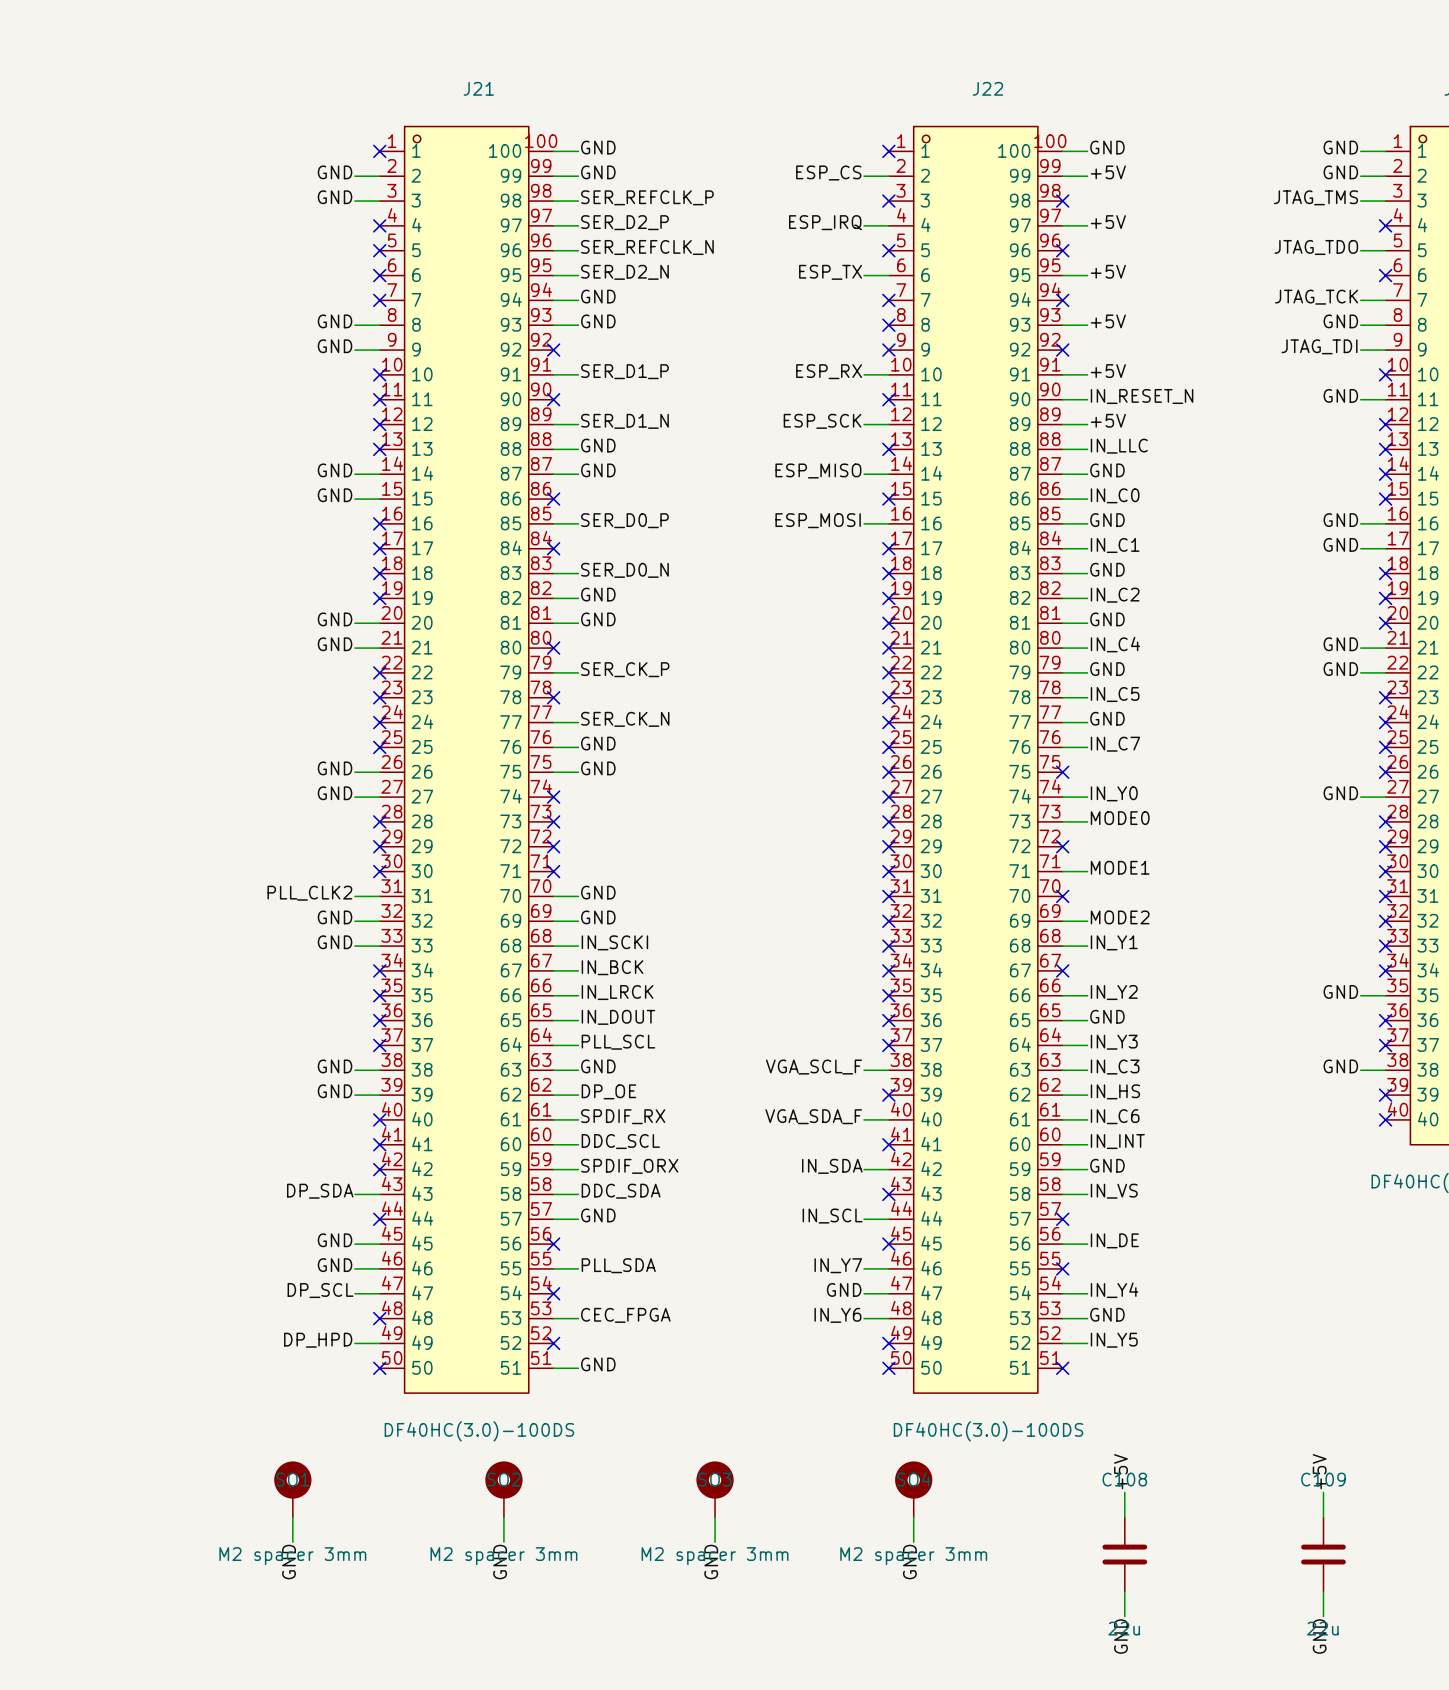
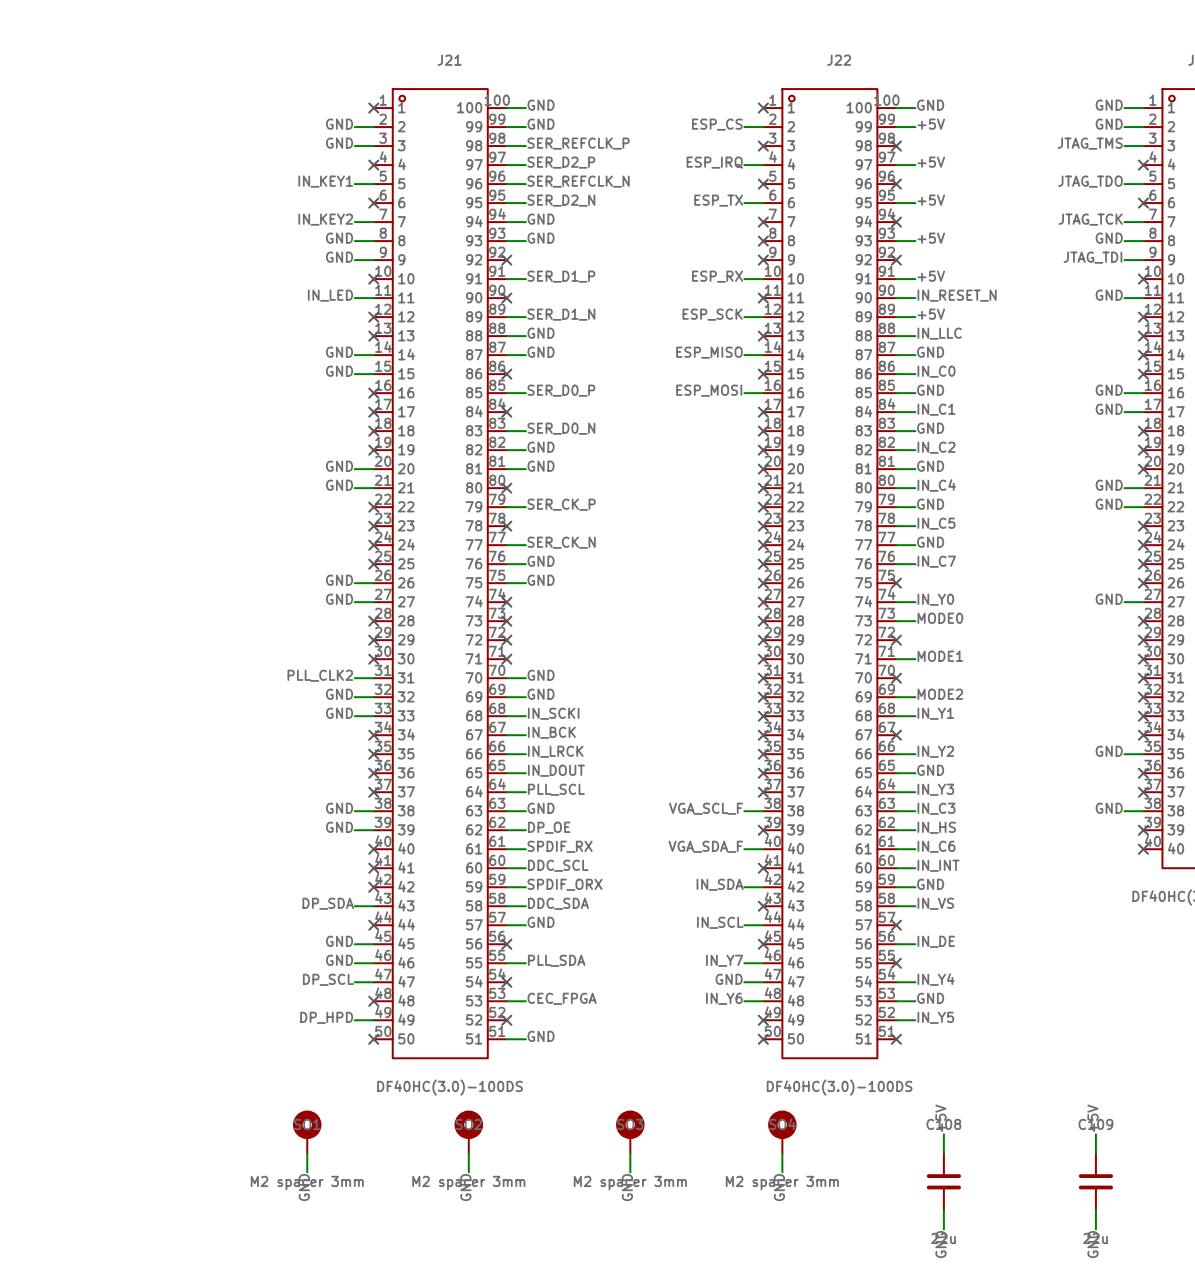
label: none -> IN_KEY1 (325, 181)
wire: none -> (354, 184) (373, 184)
no-connect mark: (379, 250) -> none
label: none -> IN_KEY2 (325, 219)
wire: none -> (354, 222) (373, 222)
no-connect mark: (379, 300) -> none
label: none -> IN_LED (330, 295)
wire: none -> (354, 298) (373, 298)
no-connect mark: (379, 399) -> none

